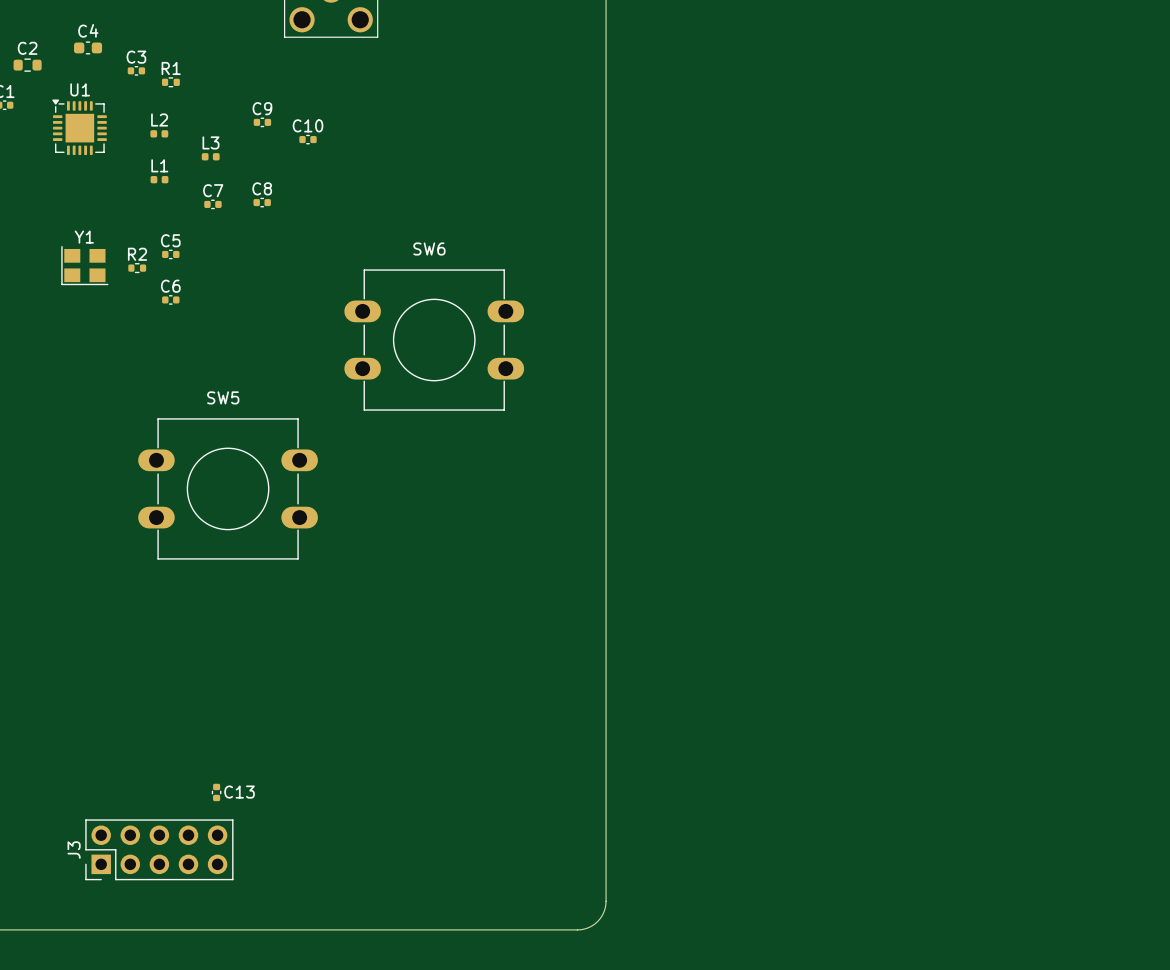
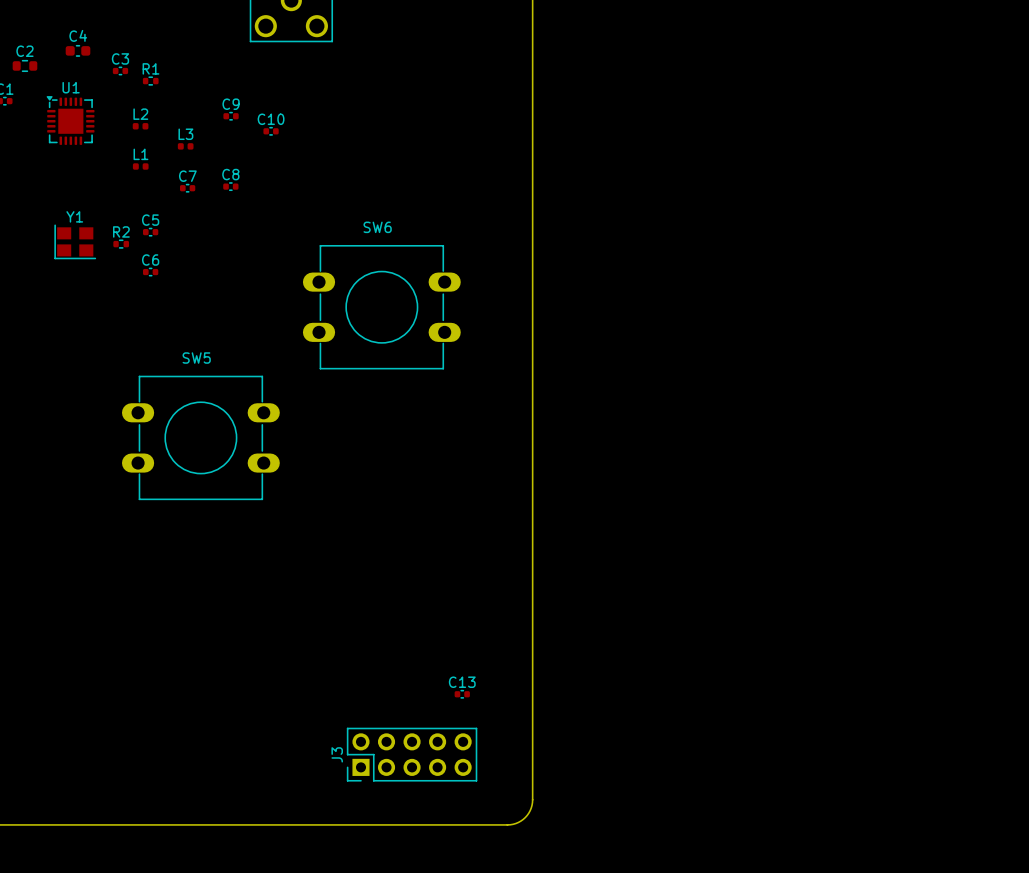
C13 rotation: 0° (216, 792) -> 90° clockwise (462, 694)
C13 position: (216, 792) -> (462, 694)
C13 name position: C13 (239, 792) -> C13 (462, 682)
J3 position: (159, 849) -> (412, 754)

